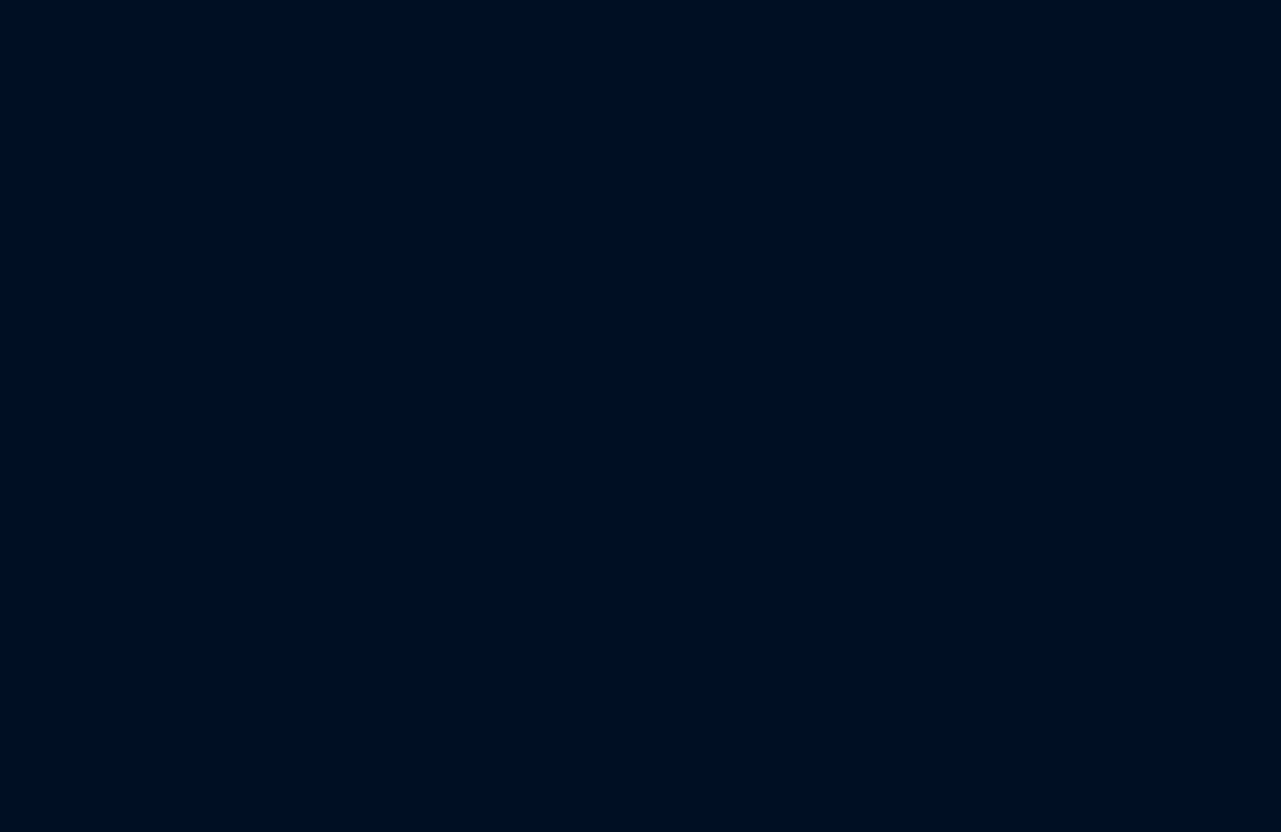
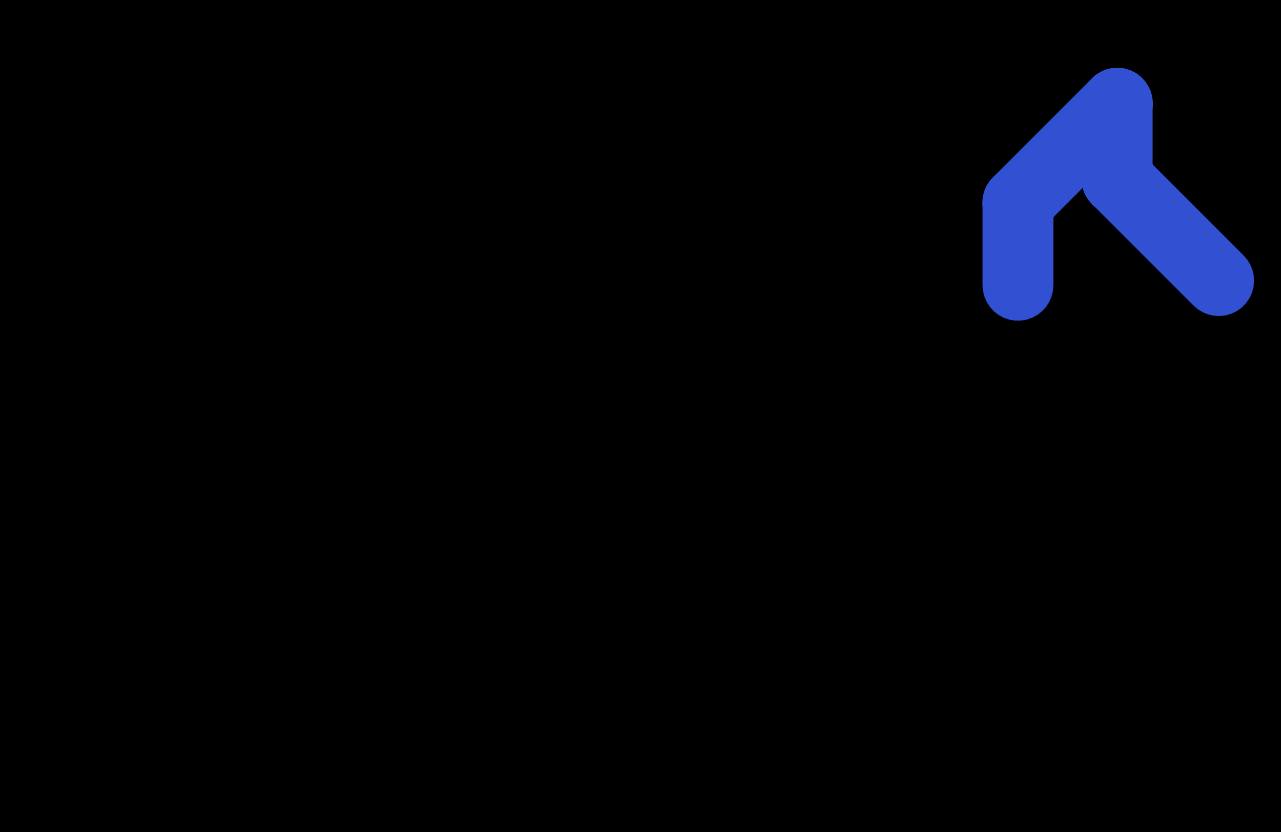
bottom track: none -> (1218, 280) (1117, 179) (1117, 103) (1017, 202) (1017, 285)

